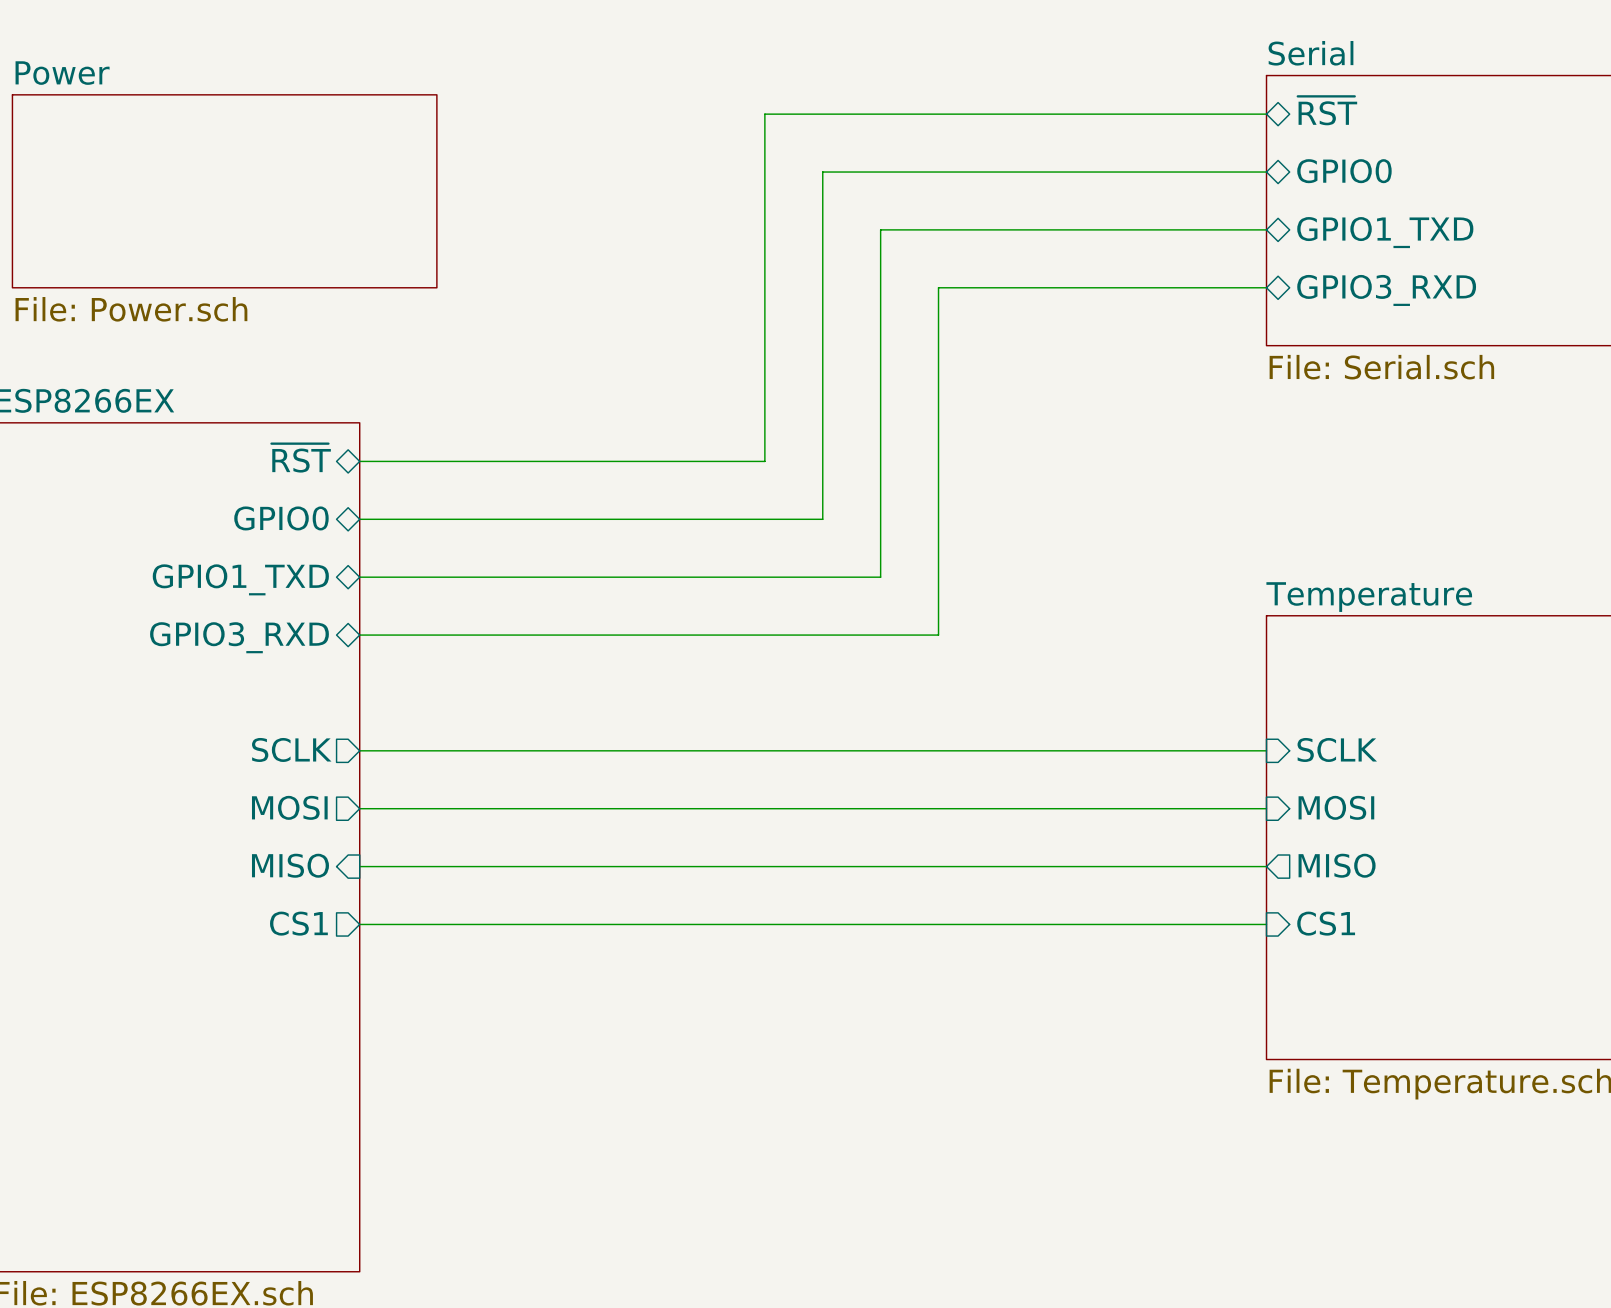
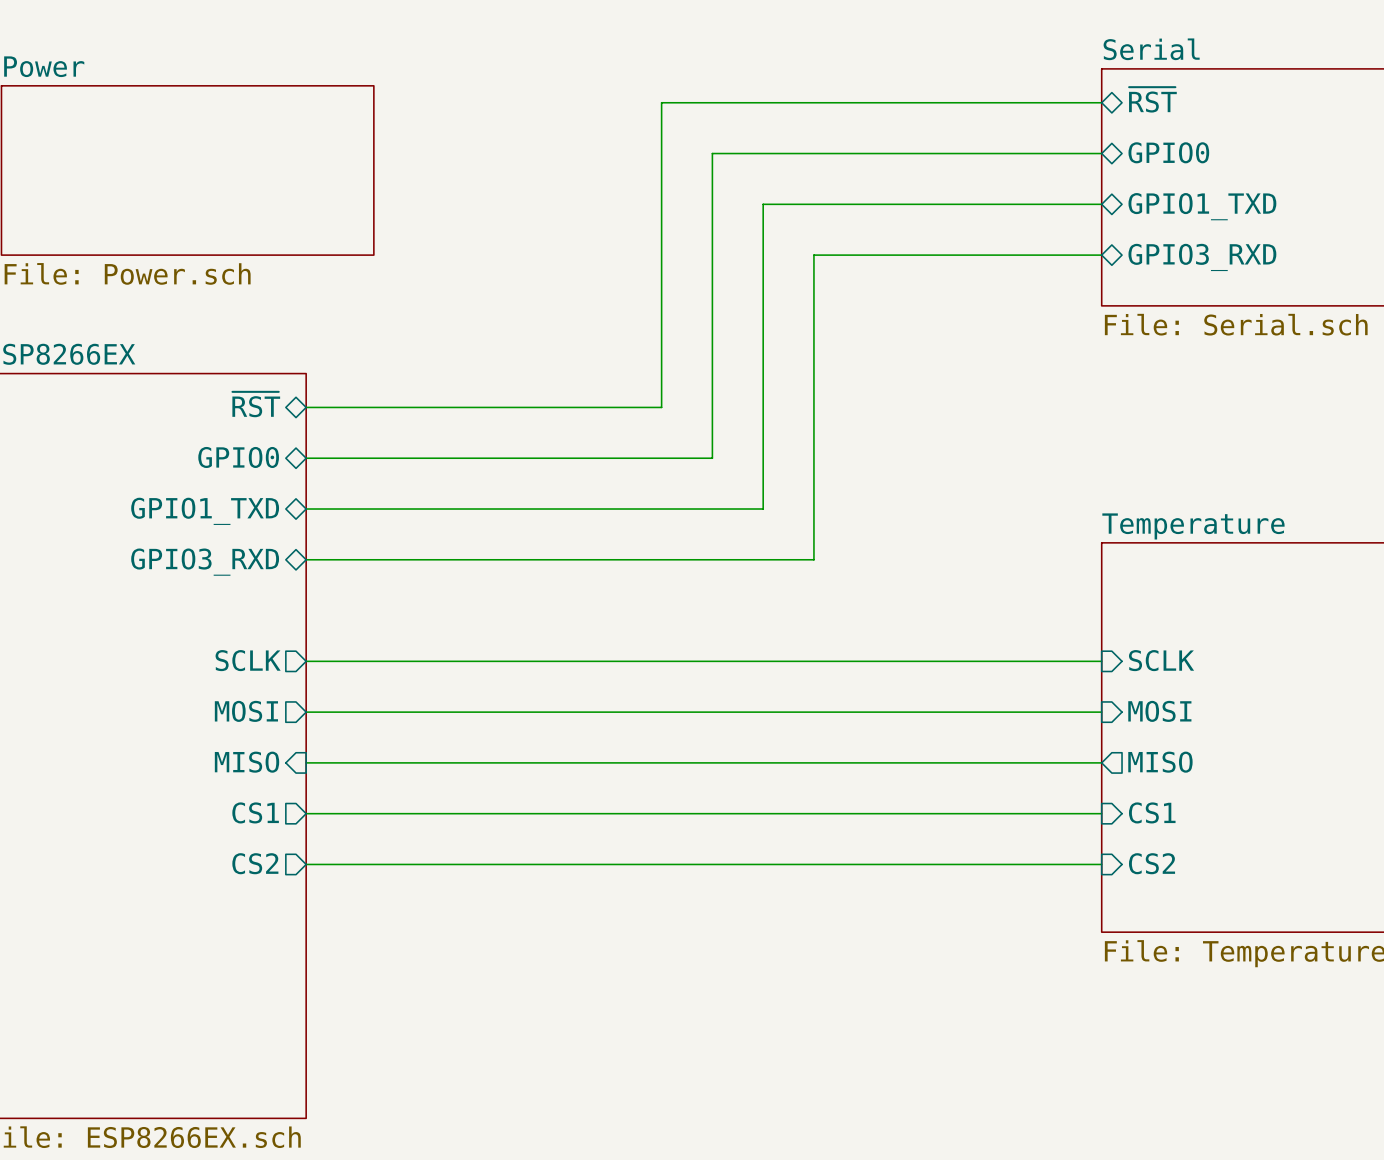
sheet pin: none -> CS2 (255, 863)
sheet pin: none -> CS2 (1152, 863)
wire: none -> (306, 864) (1101, 864)

